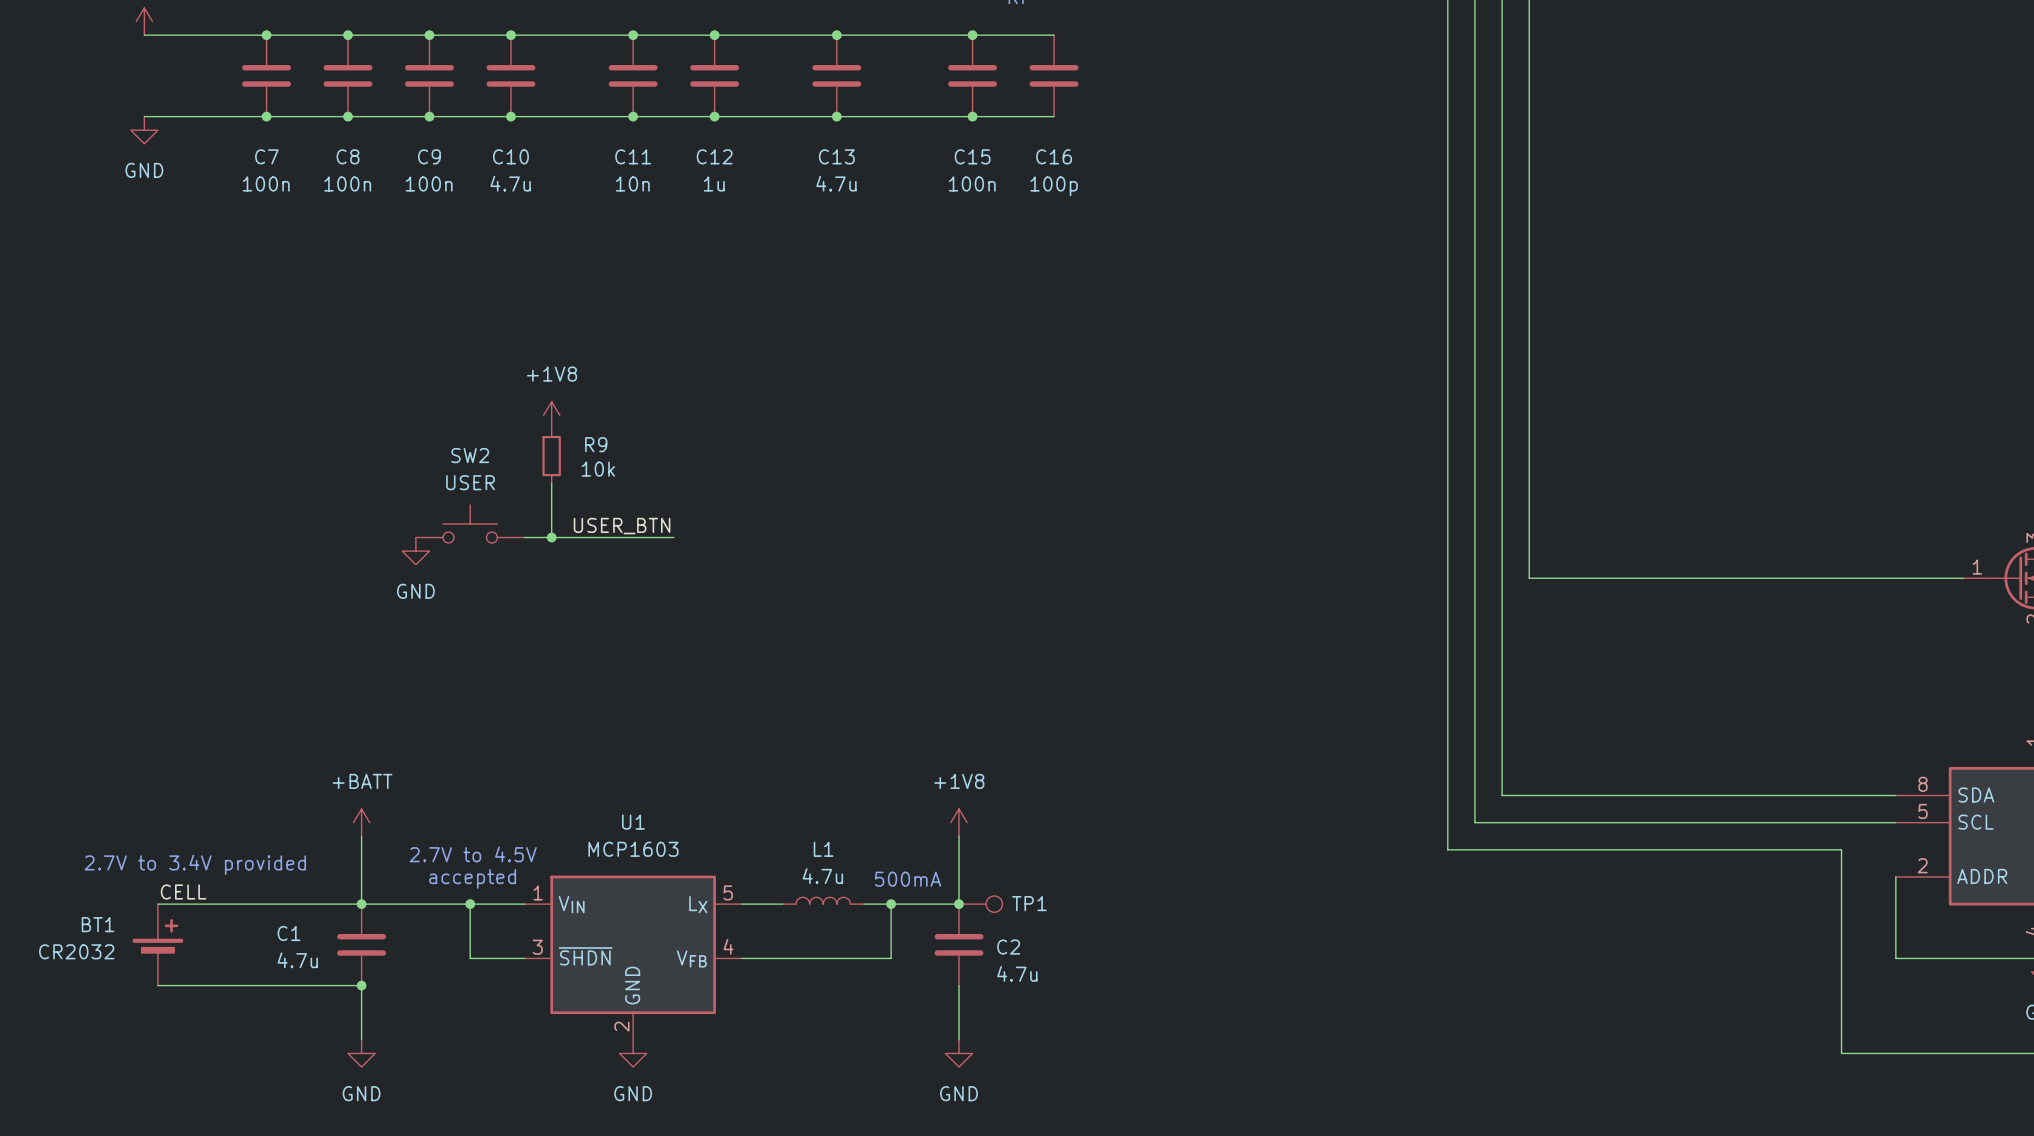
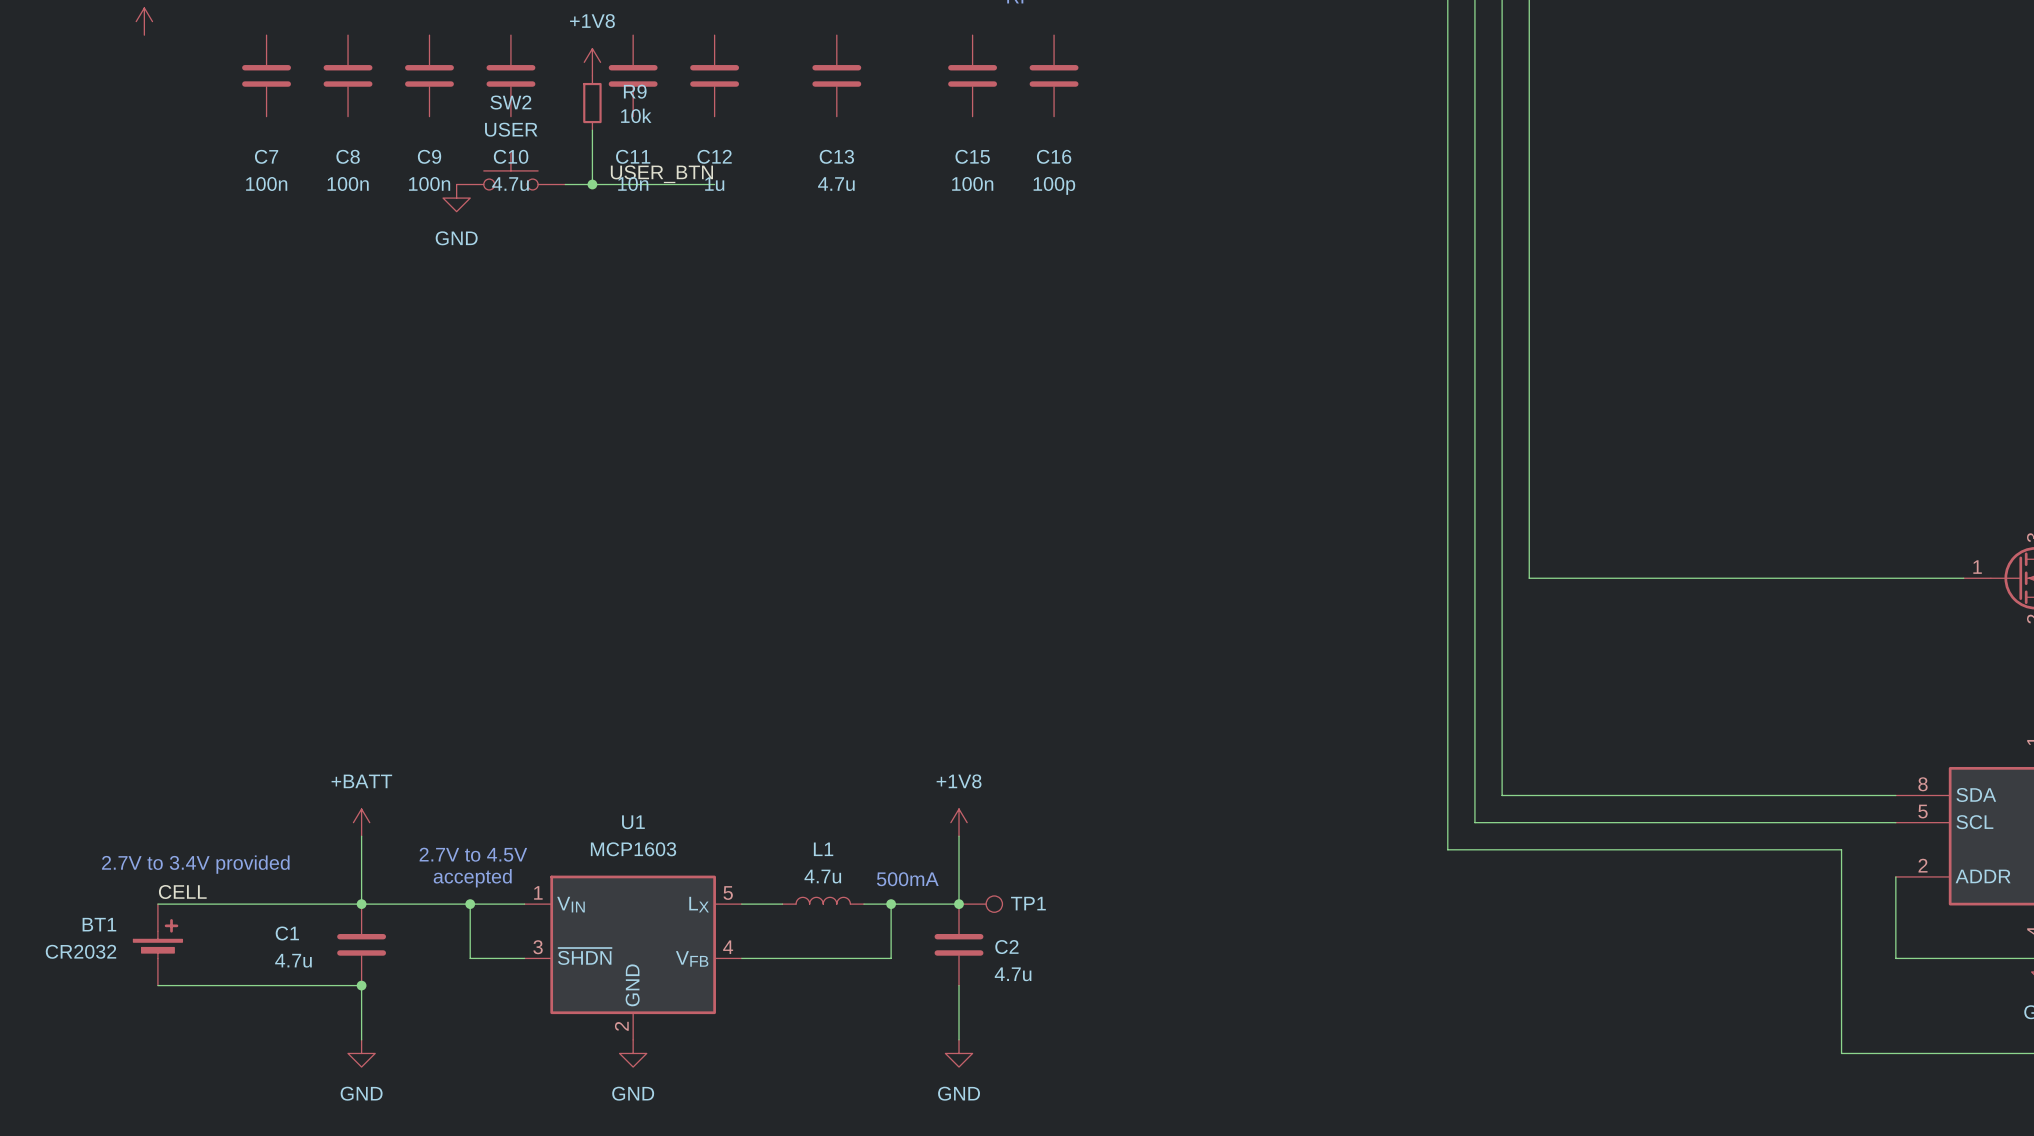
wire: (144, 35) (1054, 35) -> none
junction: (266, 35) -> none
junction: (348, 35) -> none
junction: (429, 35) -> none
junction: (510, 35) -> none
junction: (633, 35) -> none
junction: (714, 35) -> none
junction: (836, 35) -> none
junction: (972, 35) -> none
power symbol: none -> +1V8 (592, 62)
wire: (144, 116) (1054, 116) -> none
junction: (266, 116) -> none
junction: (348, 116) -> none
junction: (429, 116) -> none
junction: (510, 116) -> none
junction: (633, 116) -> none
junction: (714, 116) -> none
junction: (836, 116) -> none
junction: (972, 116) -> none
power symbol: GND (144, 130) -> none
wire: none -> (592, 130) (592, 184)
label: none -> USER_BTN (661, 174)
wire: none -> (565, 184) (714, 184)
junction: none -> (592, 184)
power symbol: none -> GND (456, 198)
power symbol: +1V8 (551, 415) -> none
R9 position: (551, 456) -> (592, 103)
wire: (551, 483) (551, 537) -> none
SW2 position: (470, 523) -> (510, 170)
label: USER_BTN (622, 526) -> none
wire: (524, 537) (673, 537) -> none
junction: (551, 537) -> none
power symbol: GND (415, 551) -> none

